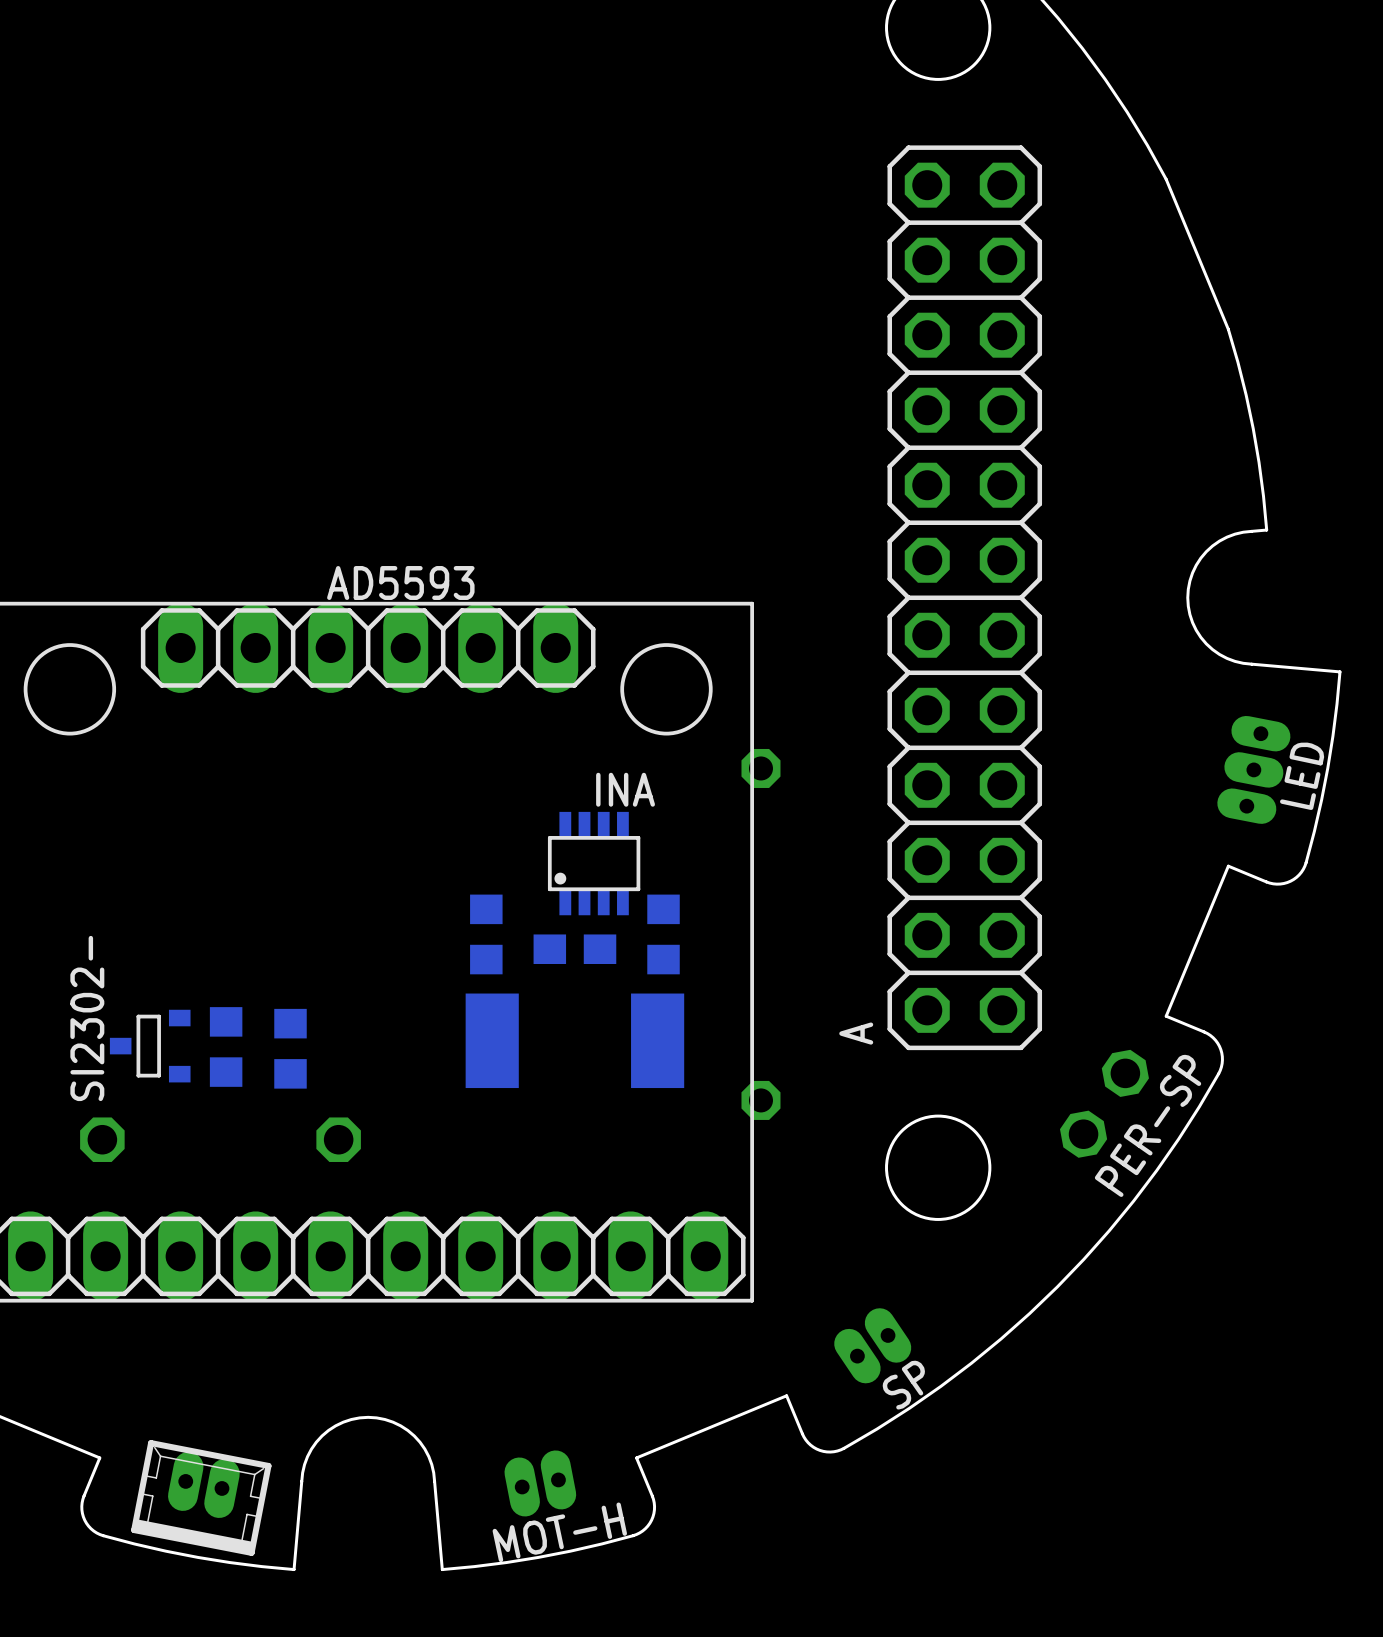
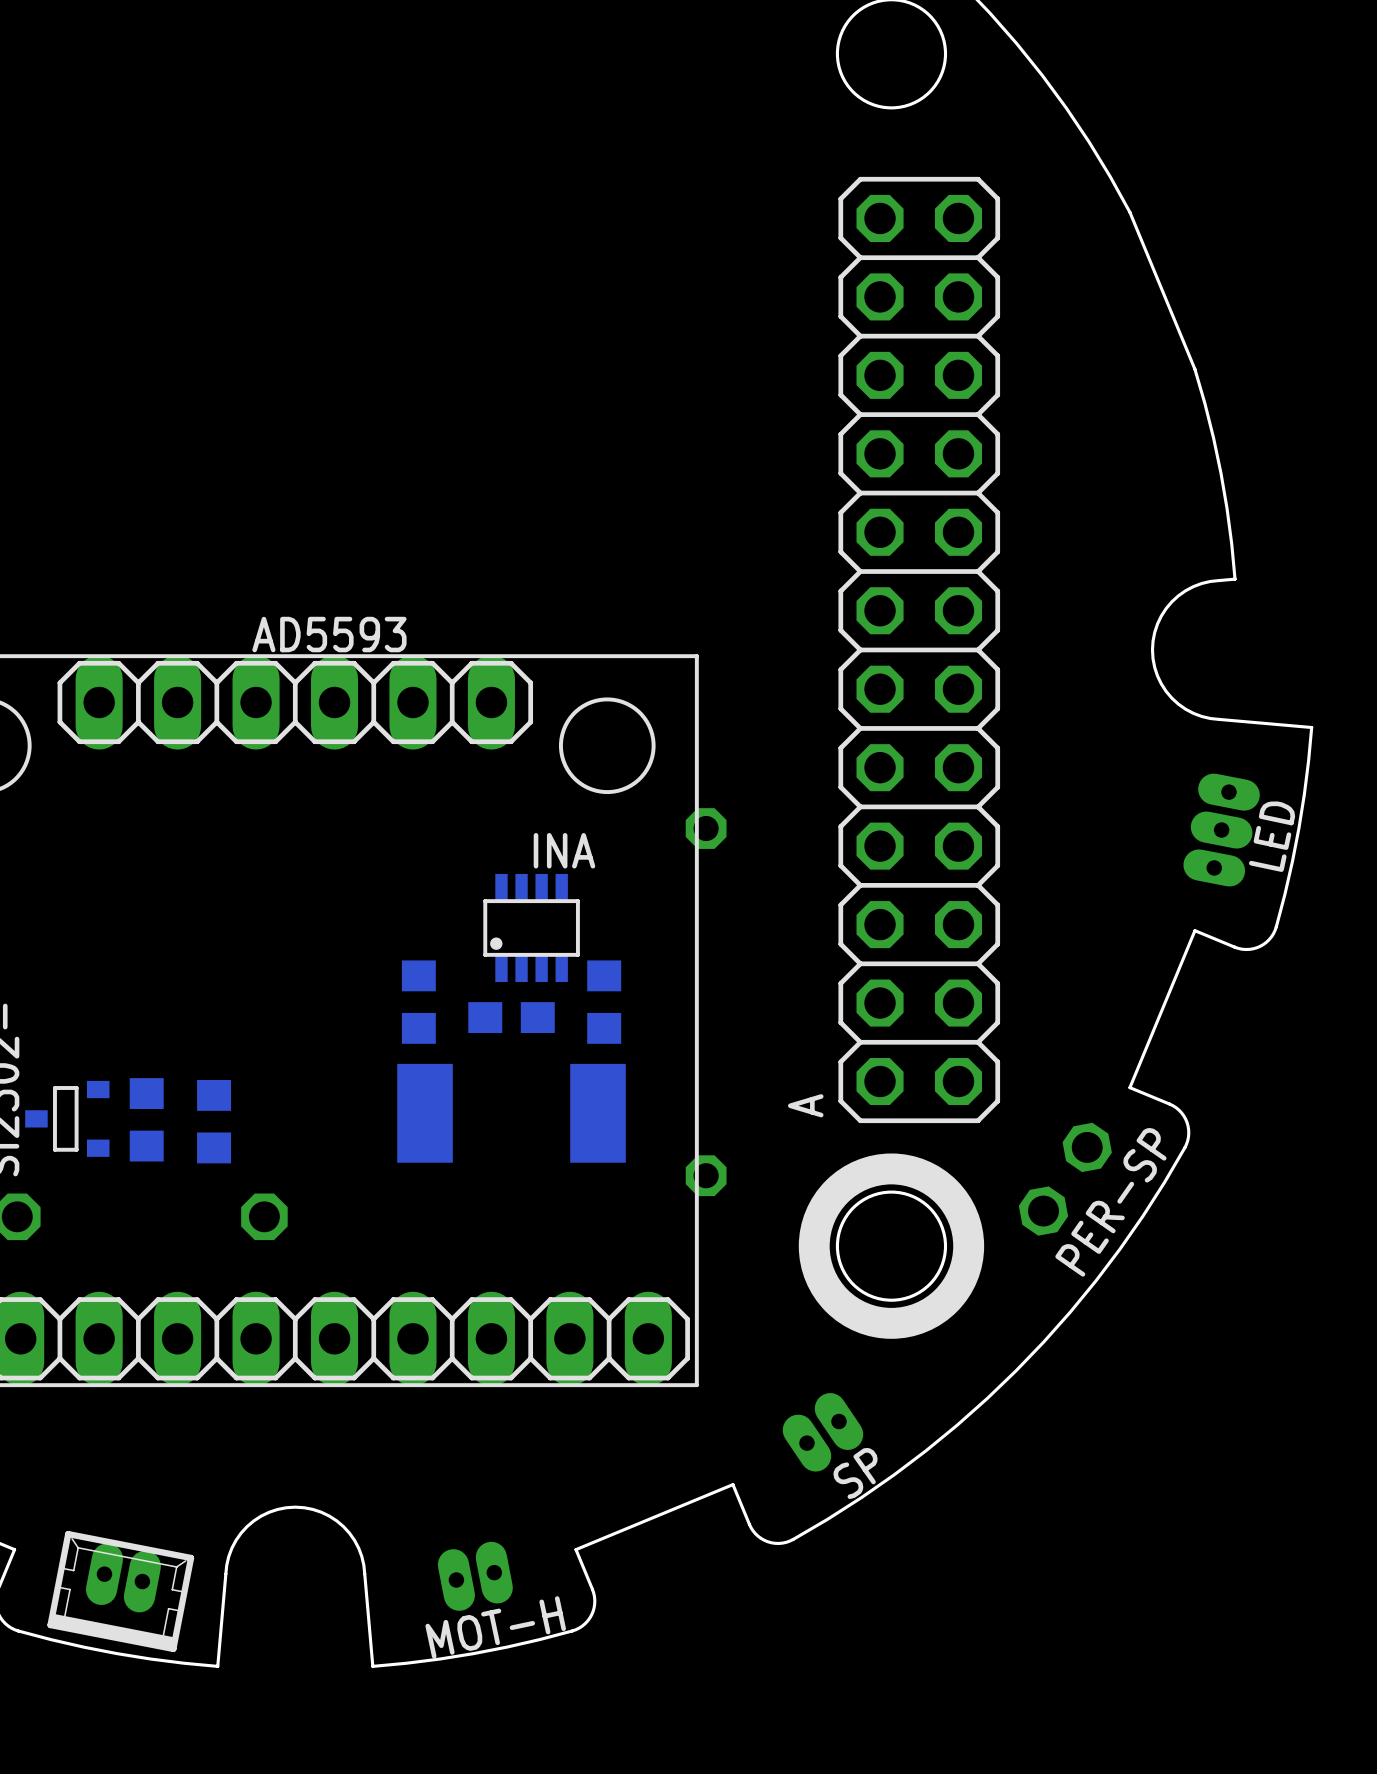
drawing: none -> [798, 1153, 985, 1339]

